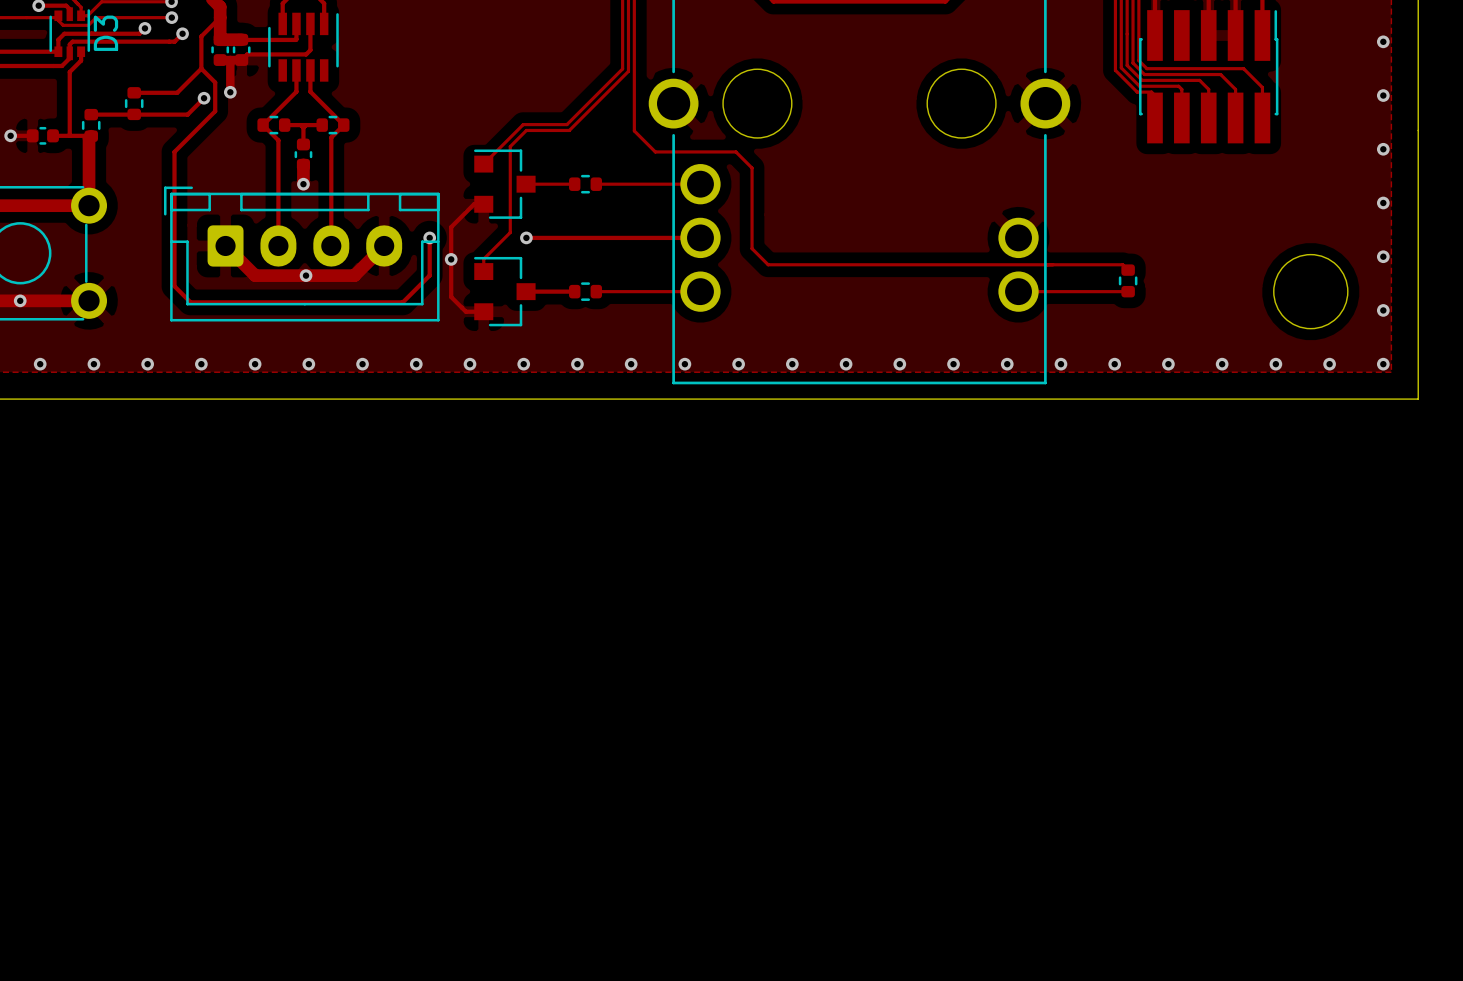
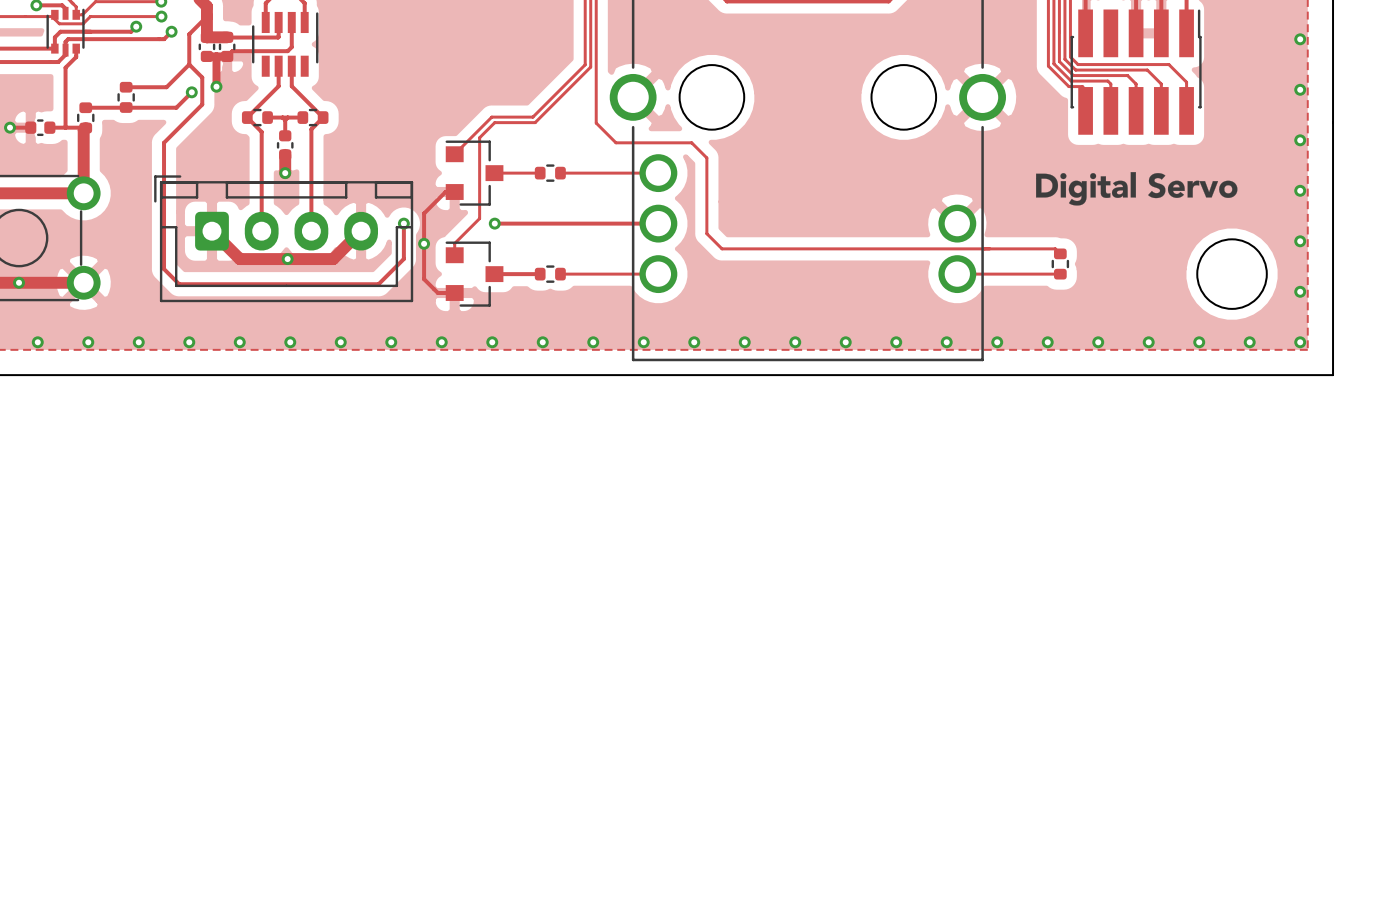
D3 name: D3 (105, 33) -> none
drawing: none -> [1036, 172, 1238, 206]

